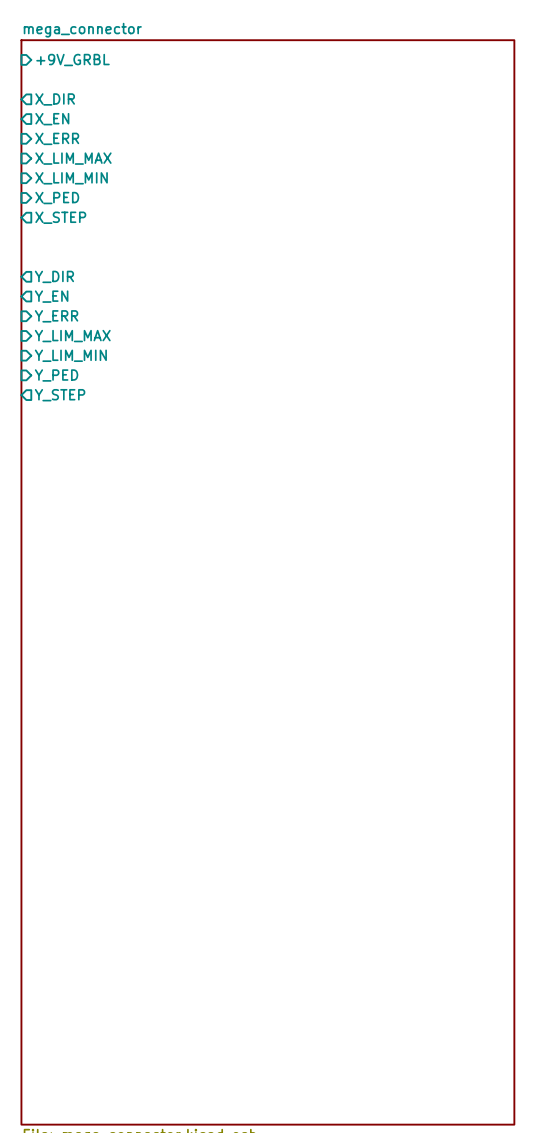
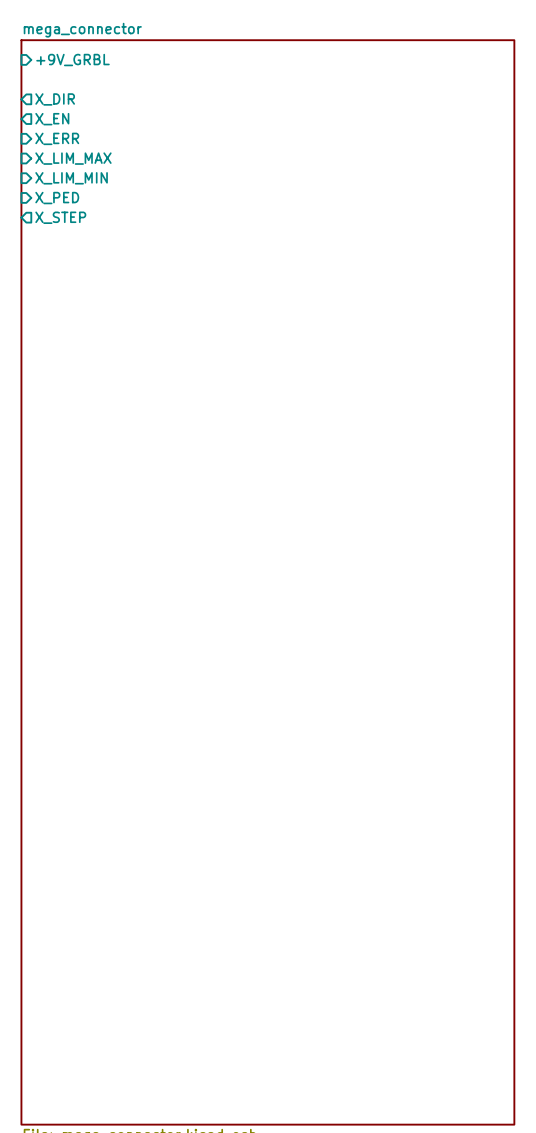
sheet pin: Y_DIR (54, 276) -> none
sheet pin: Y_EN (51, 296) -> none
sheet pin: Y_ERR (56, 316) -> none
sheet pin: Y_LIM_MAX (72, 336) -> none
sheet pin: Y_LIM_MIN (70, 355) -> none
sheet pin: Y_PED (56, 375) -> none
sheet pin: Y_STEP (60, 395) -> none

